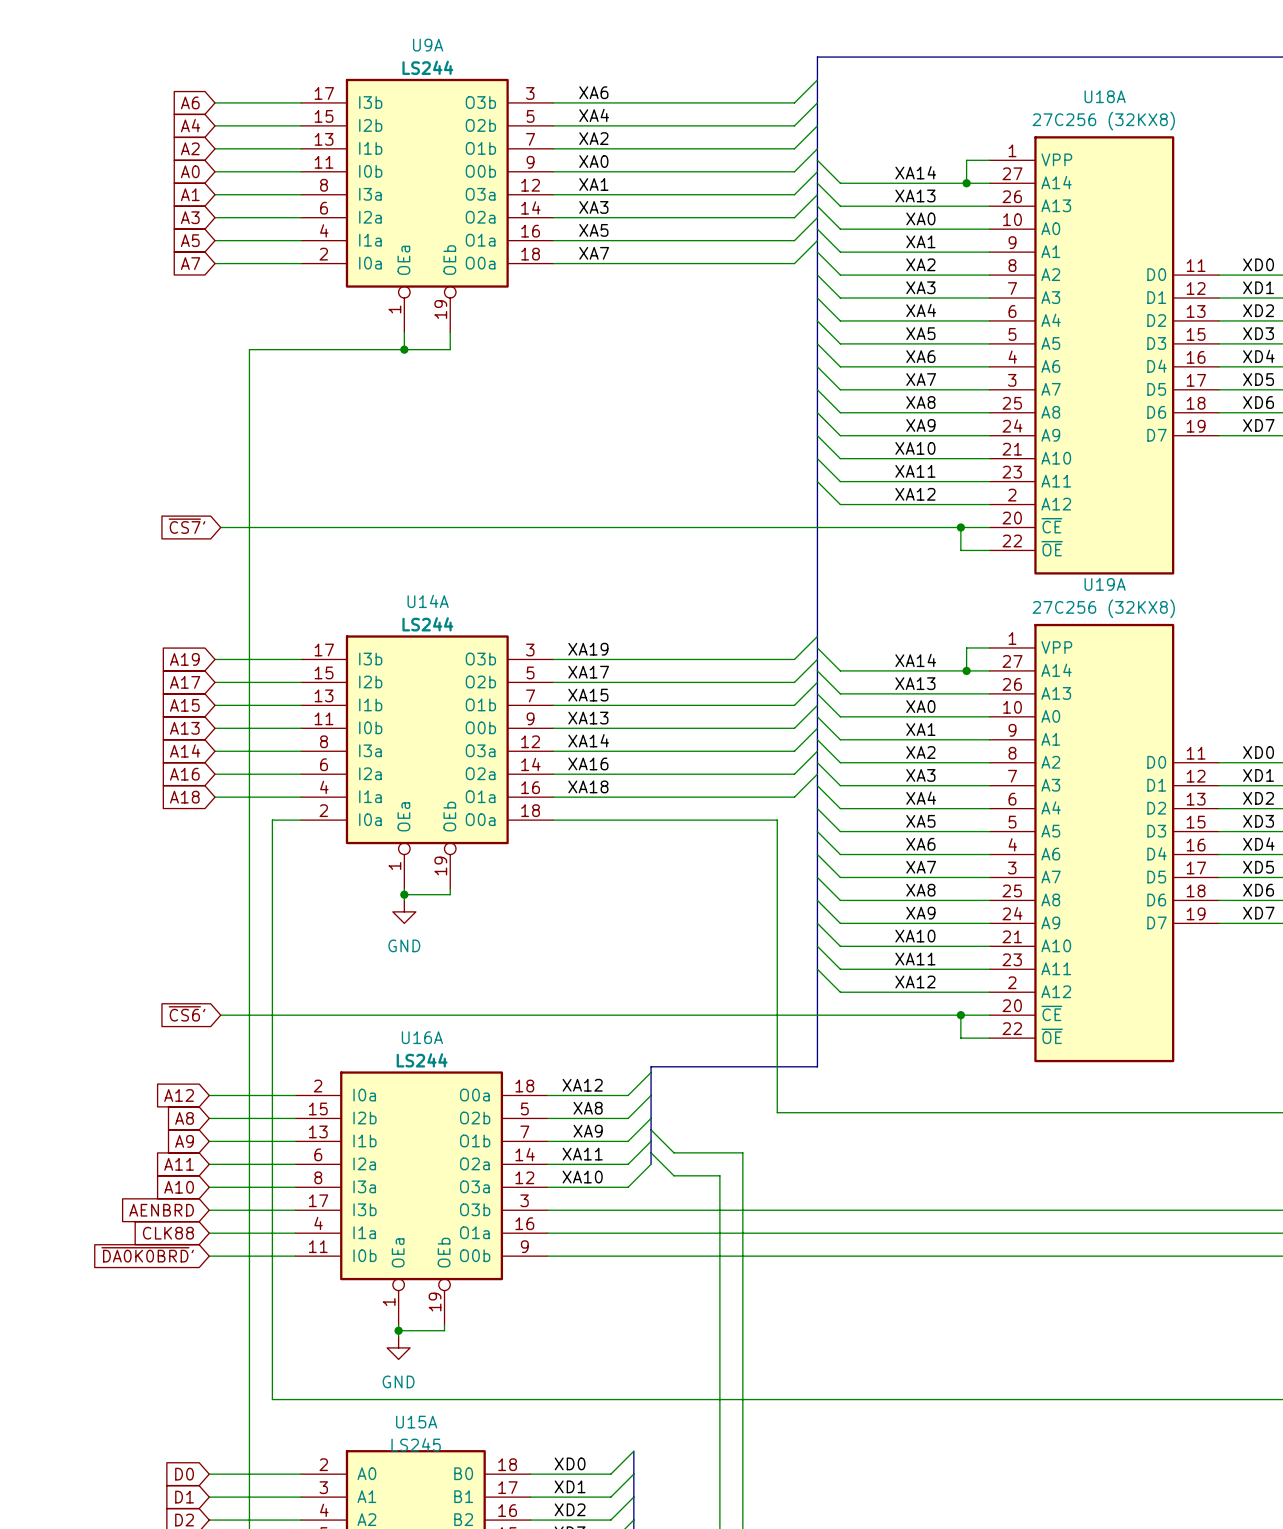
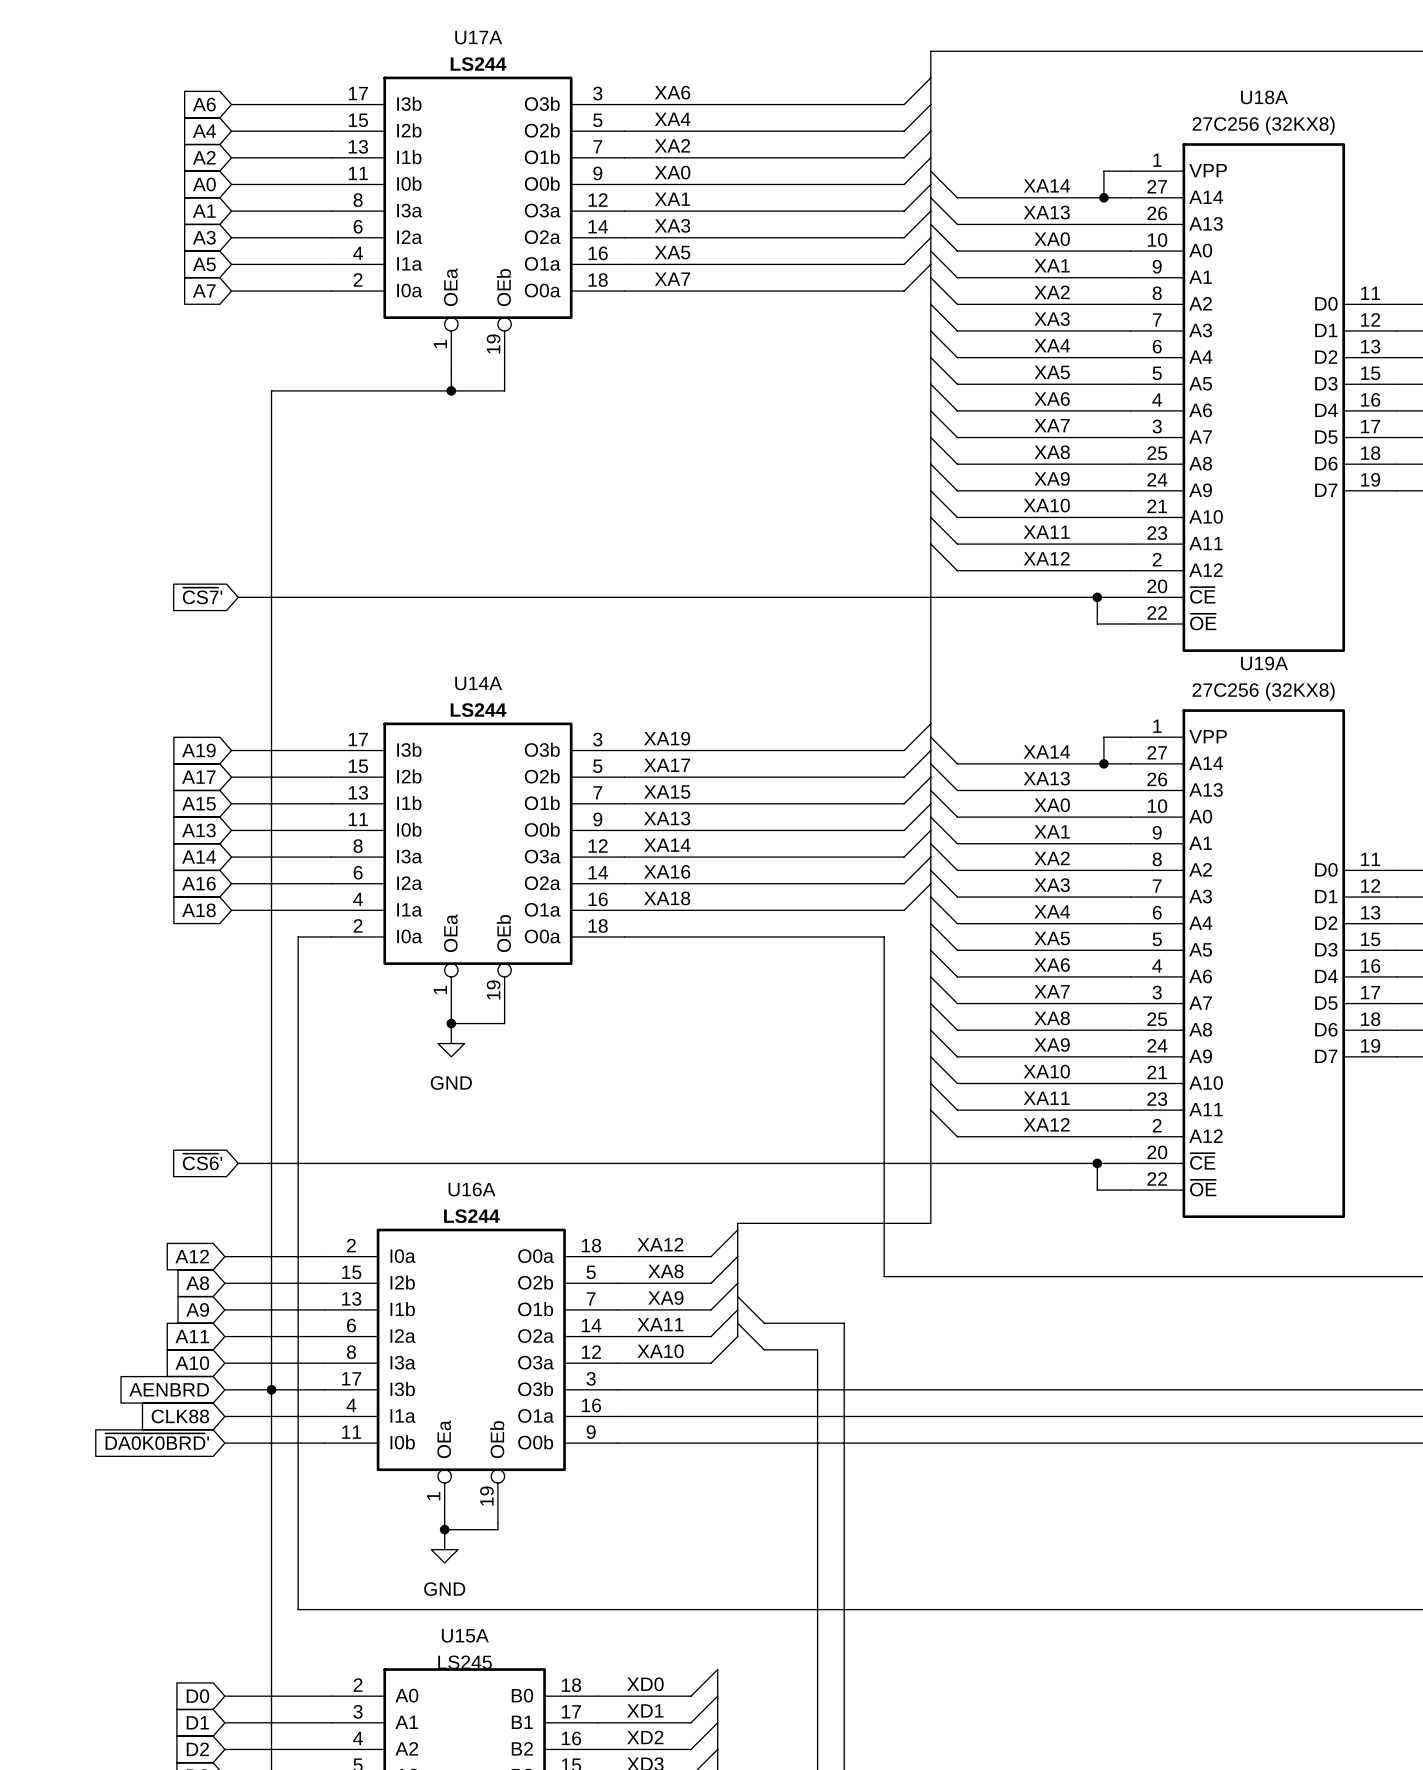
U9A name: U9A (428, 45) -> U17A (478, 37)
junction: none -> (271, 1389)

